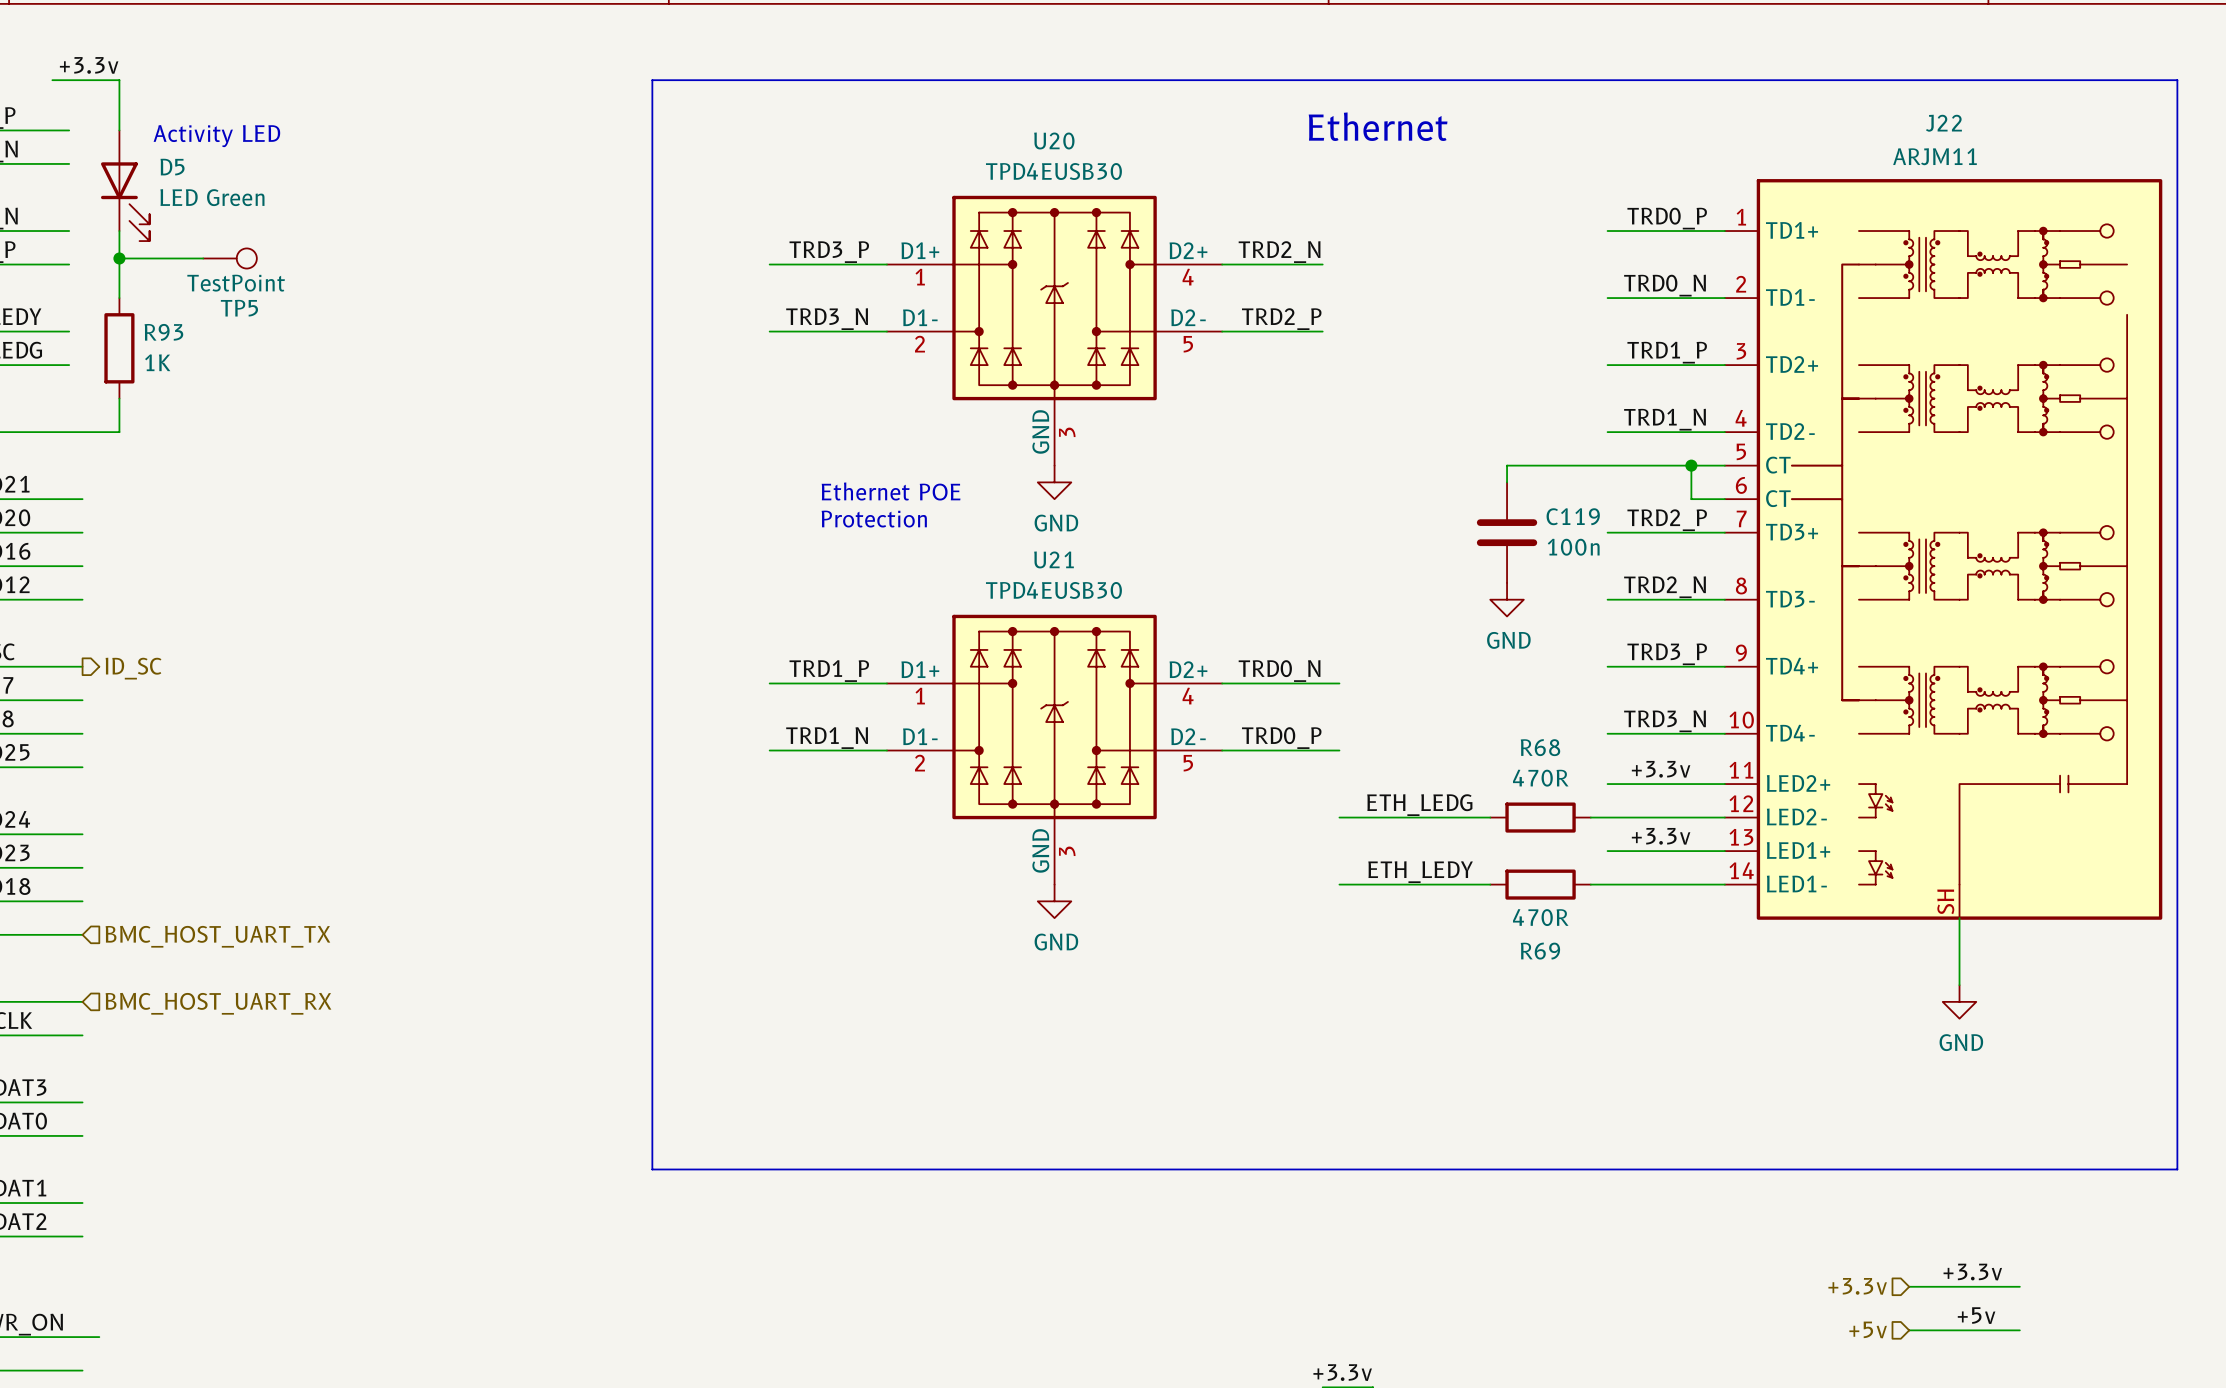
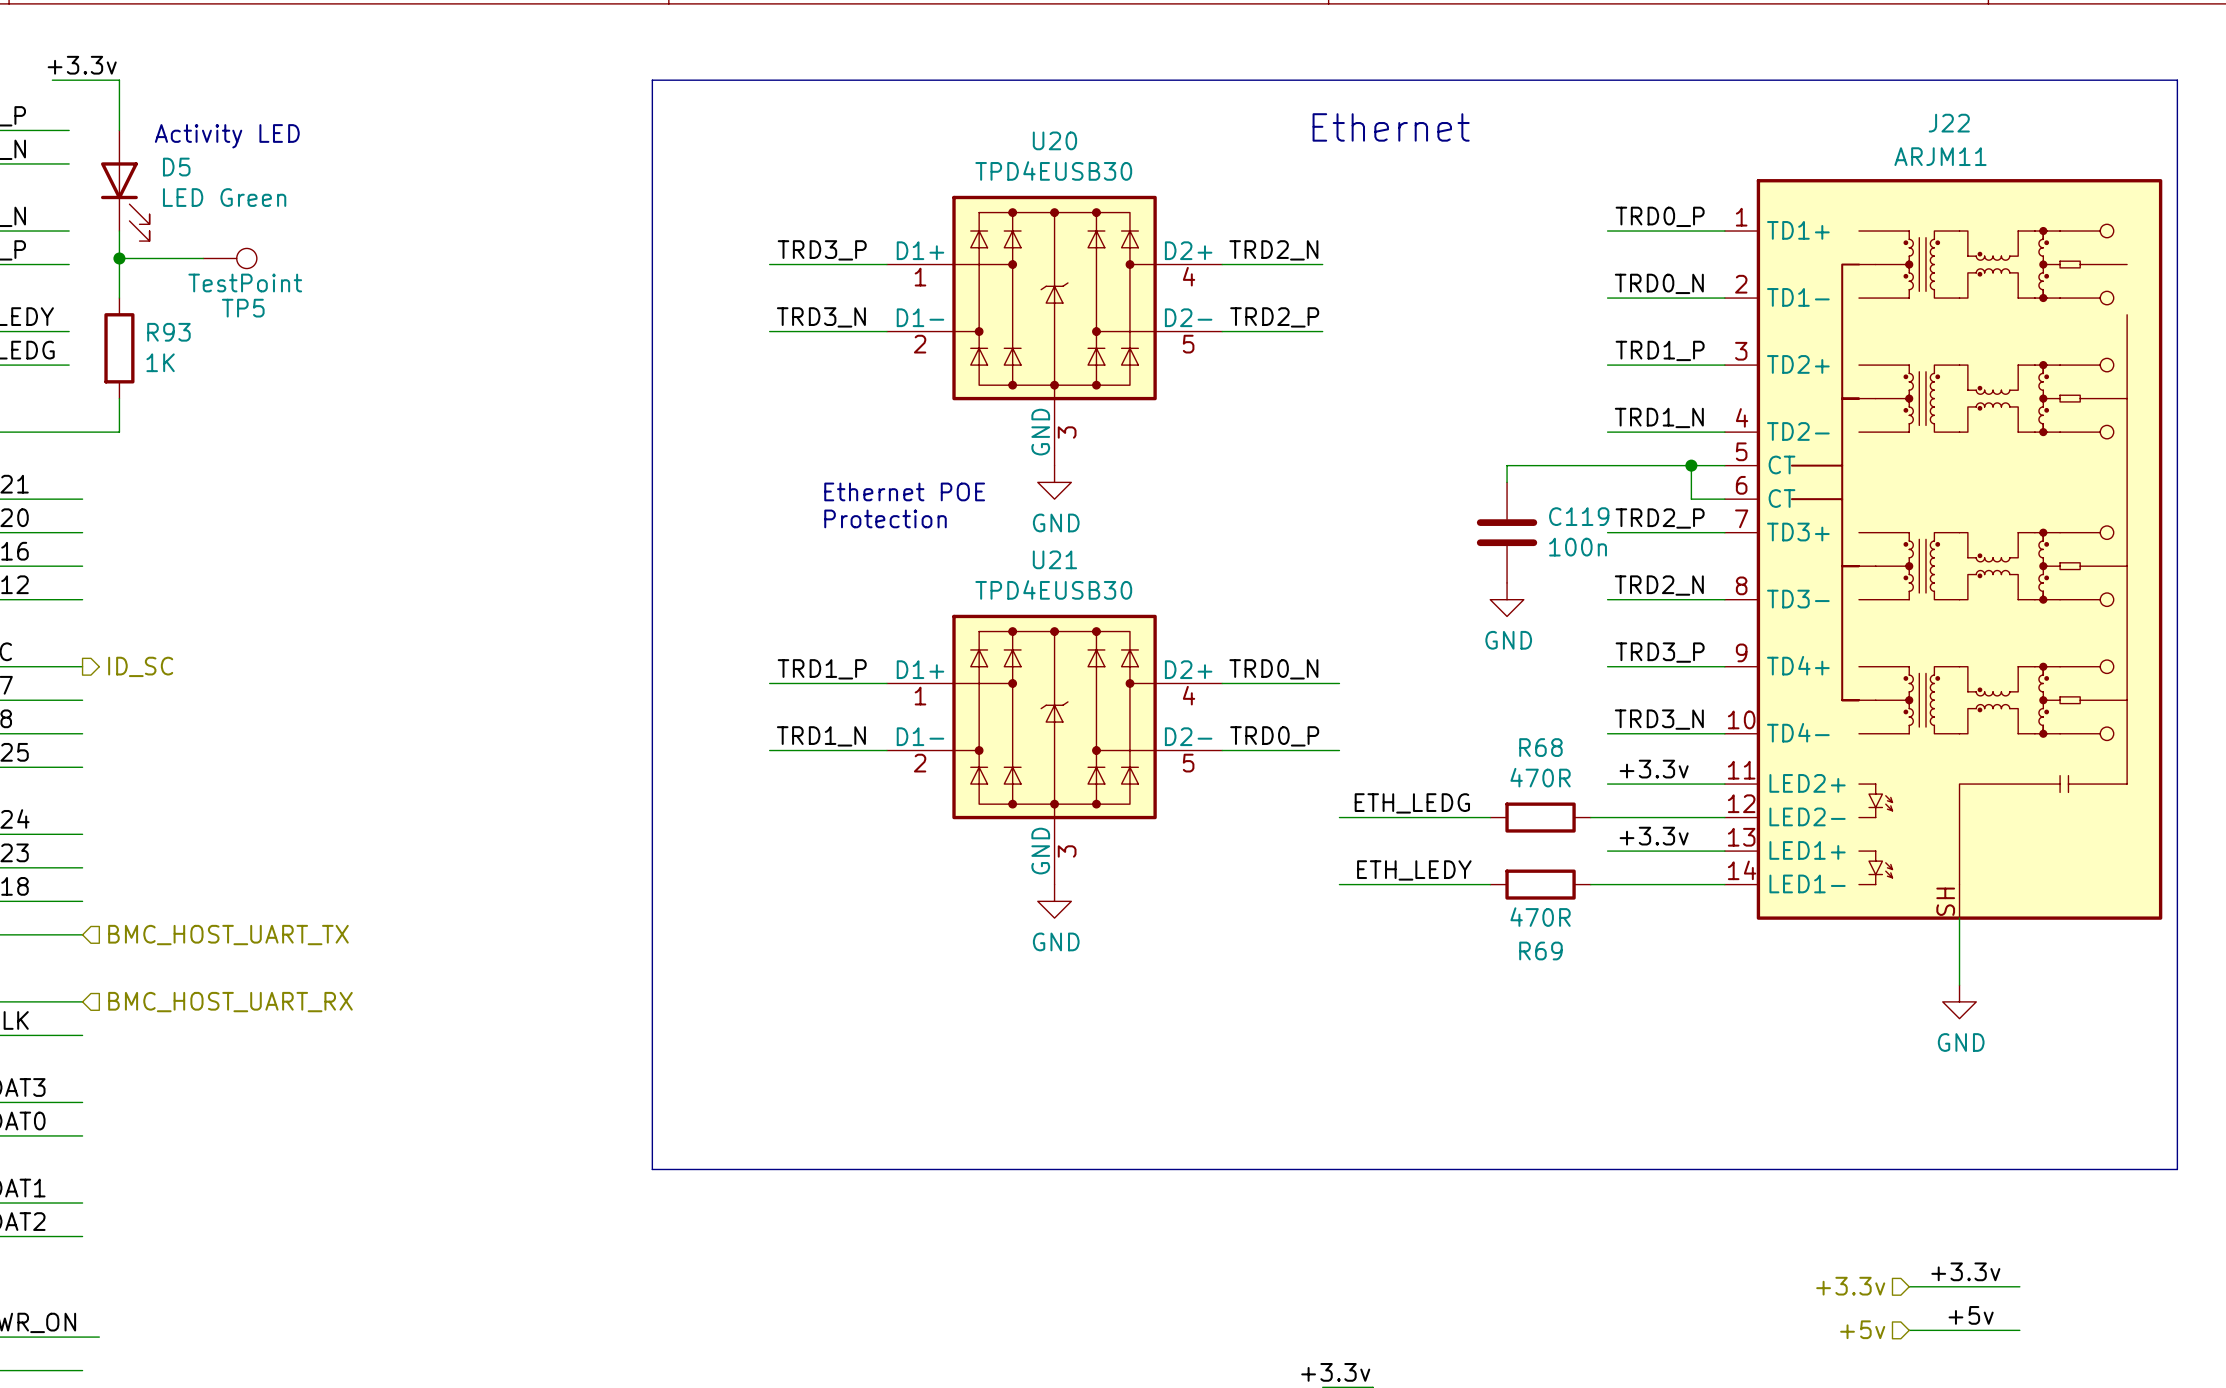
J22 symbol: [1724, 179, 2163, 920] -> [1724, 179, 2163, 920]

